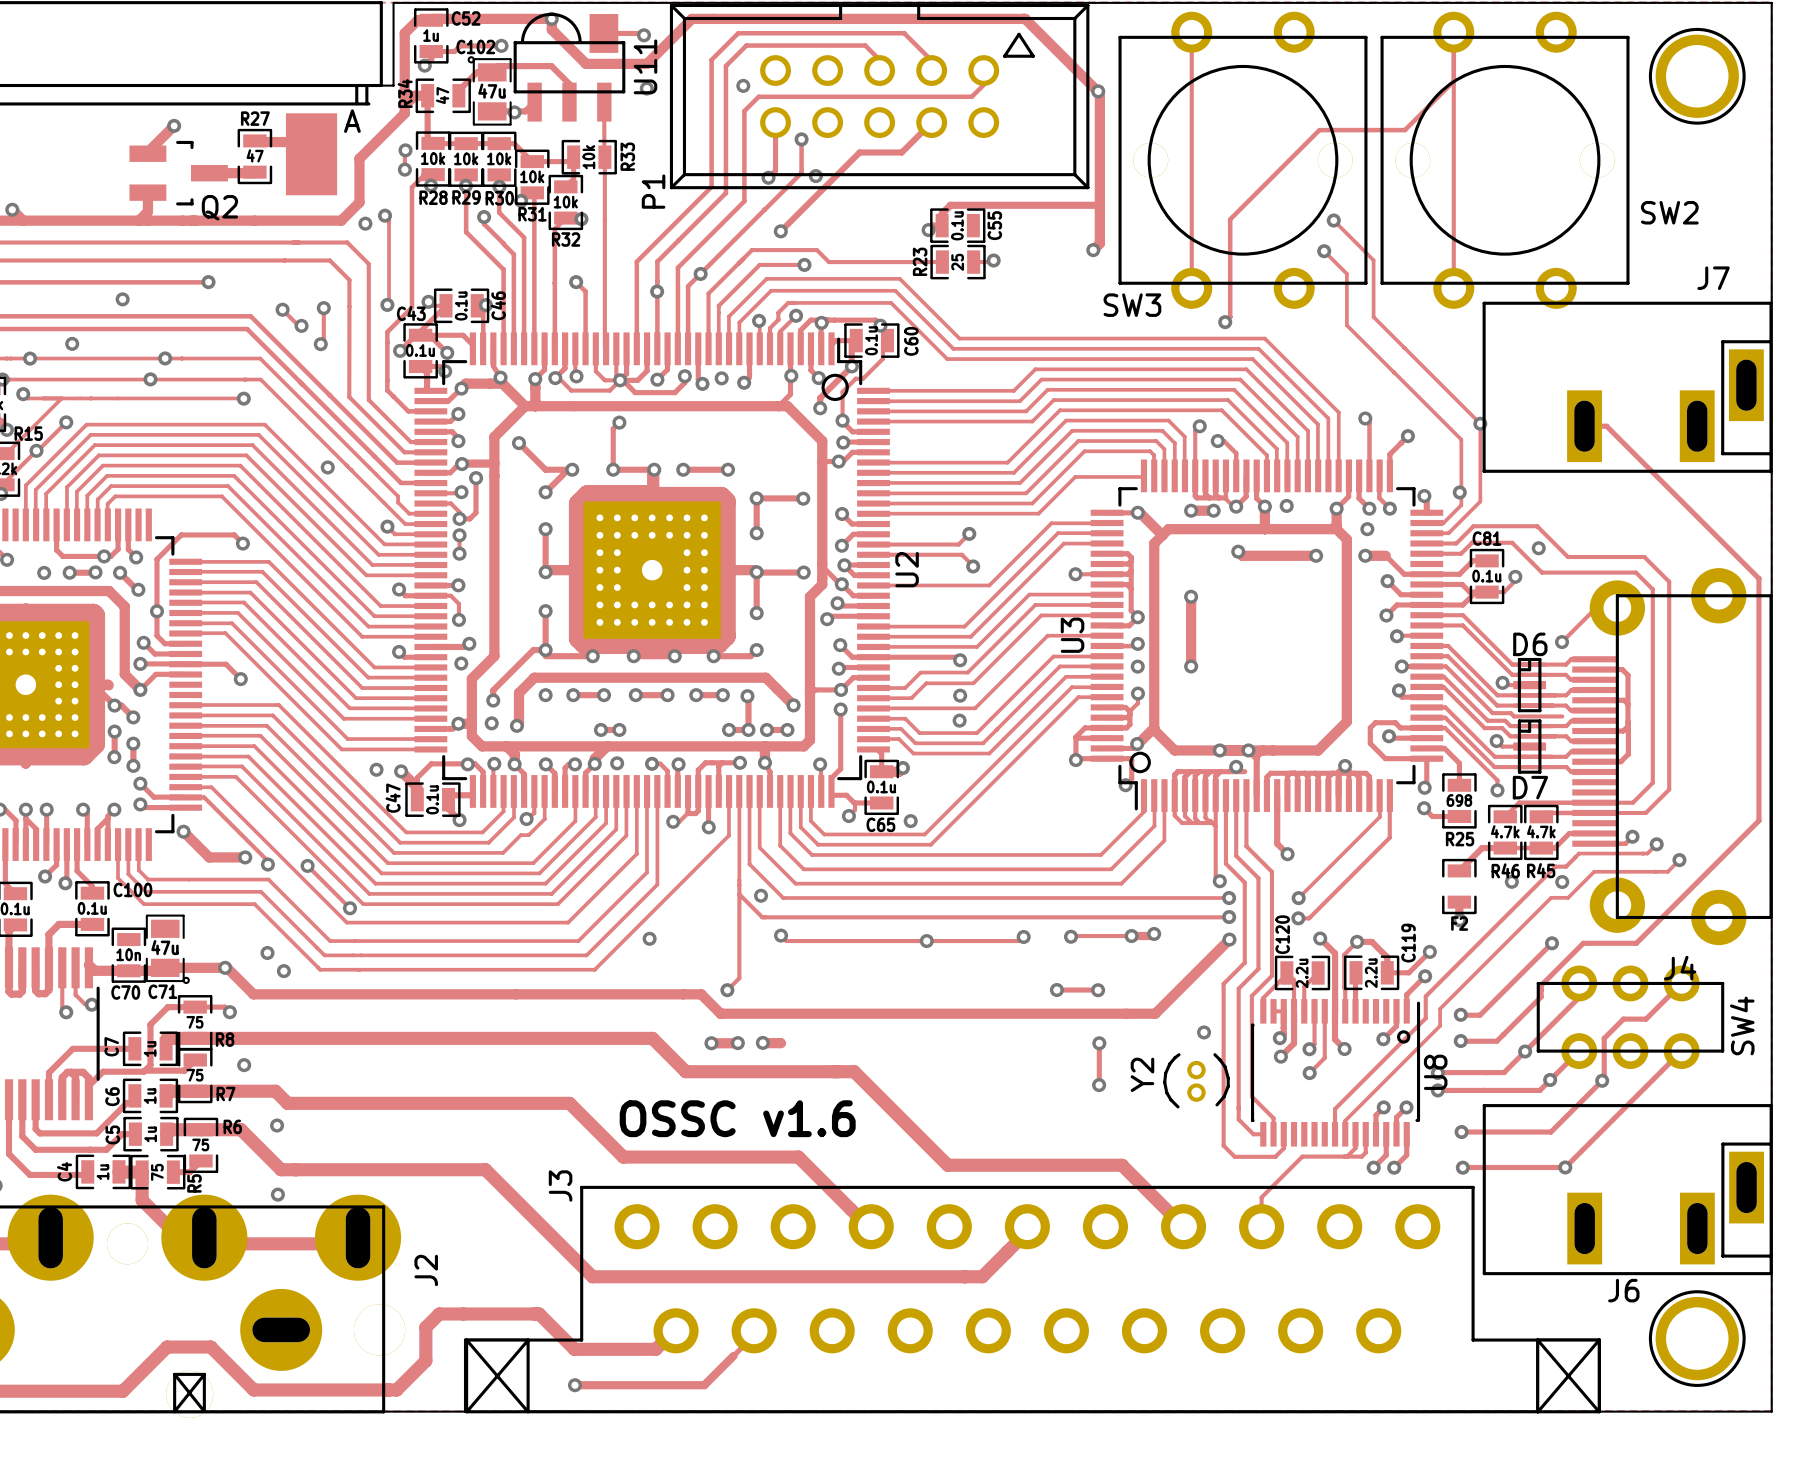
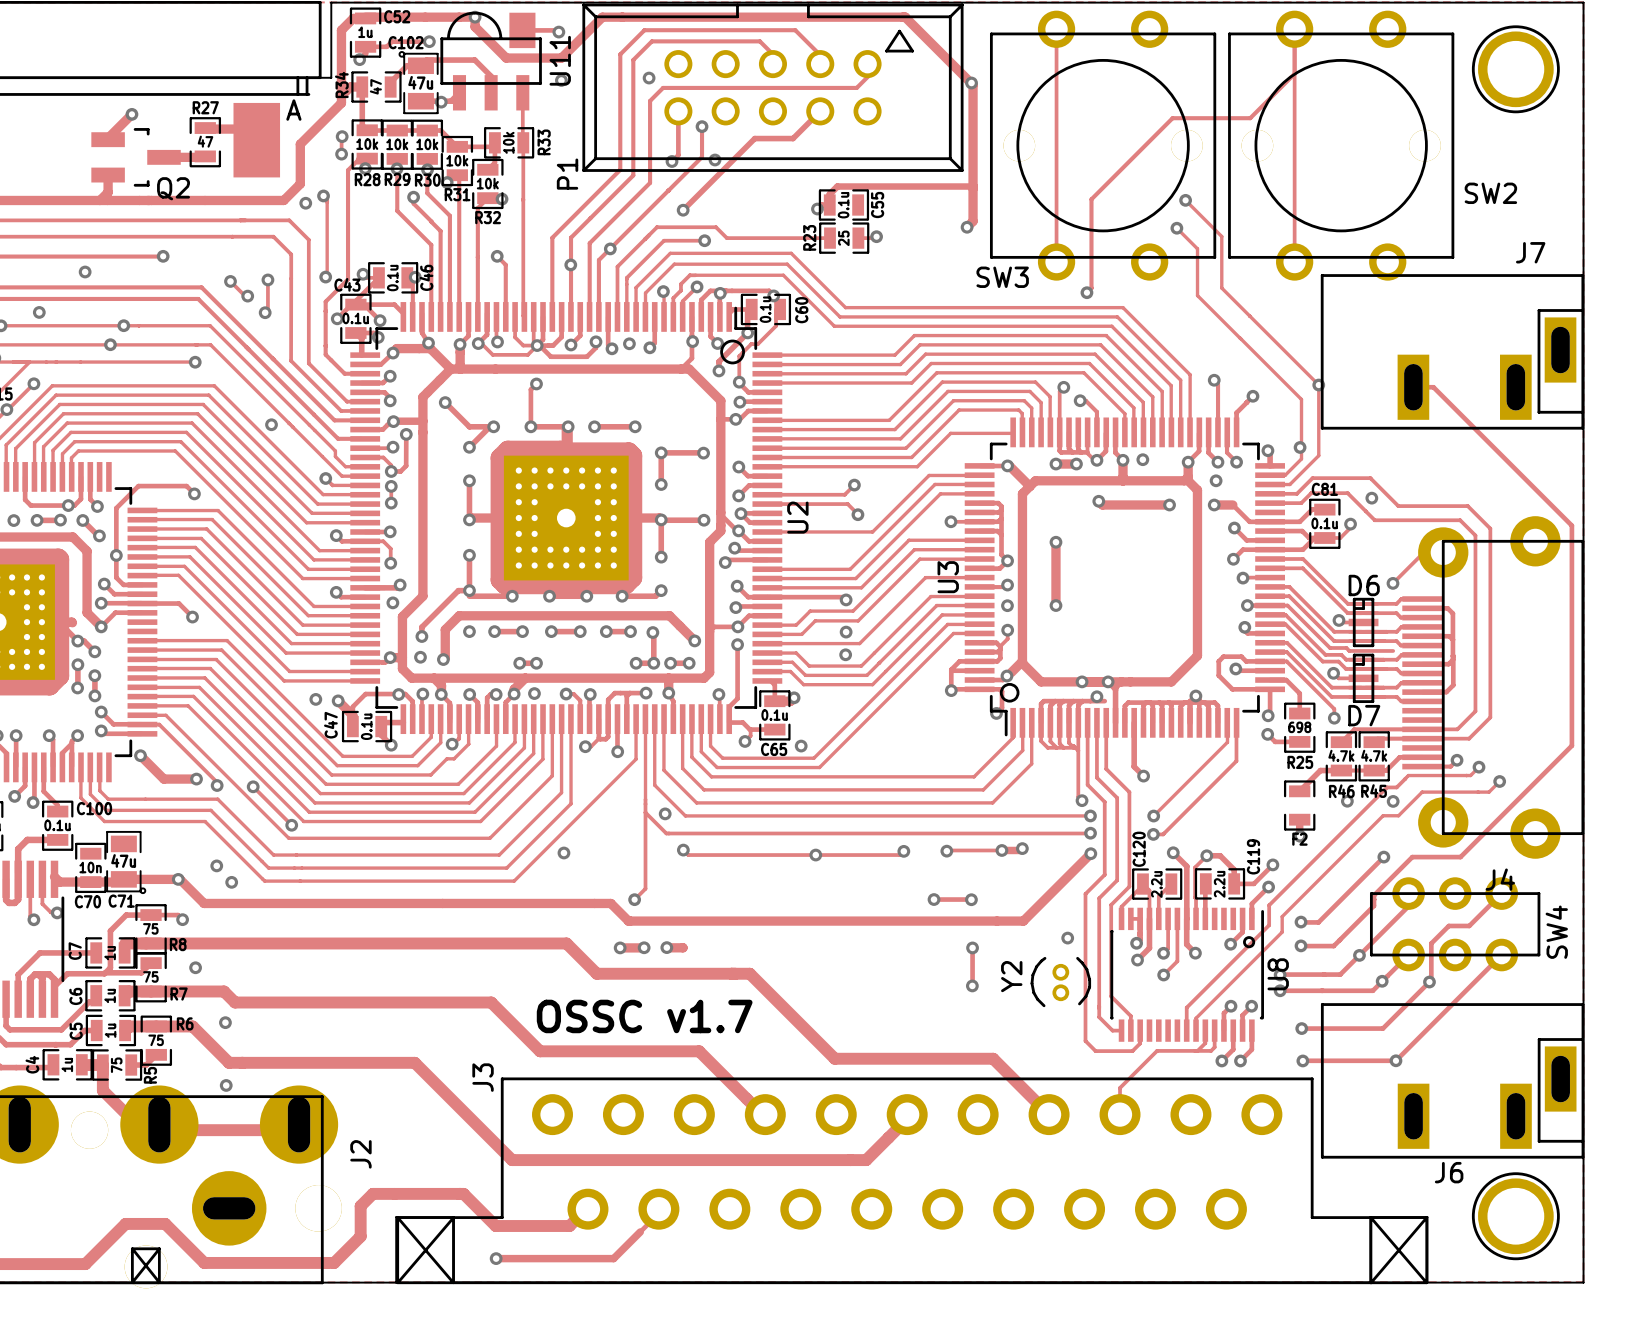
text: OSSC v1.6 (737, 1118) -> OSSC v1.7 (644, 1016)

